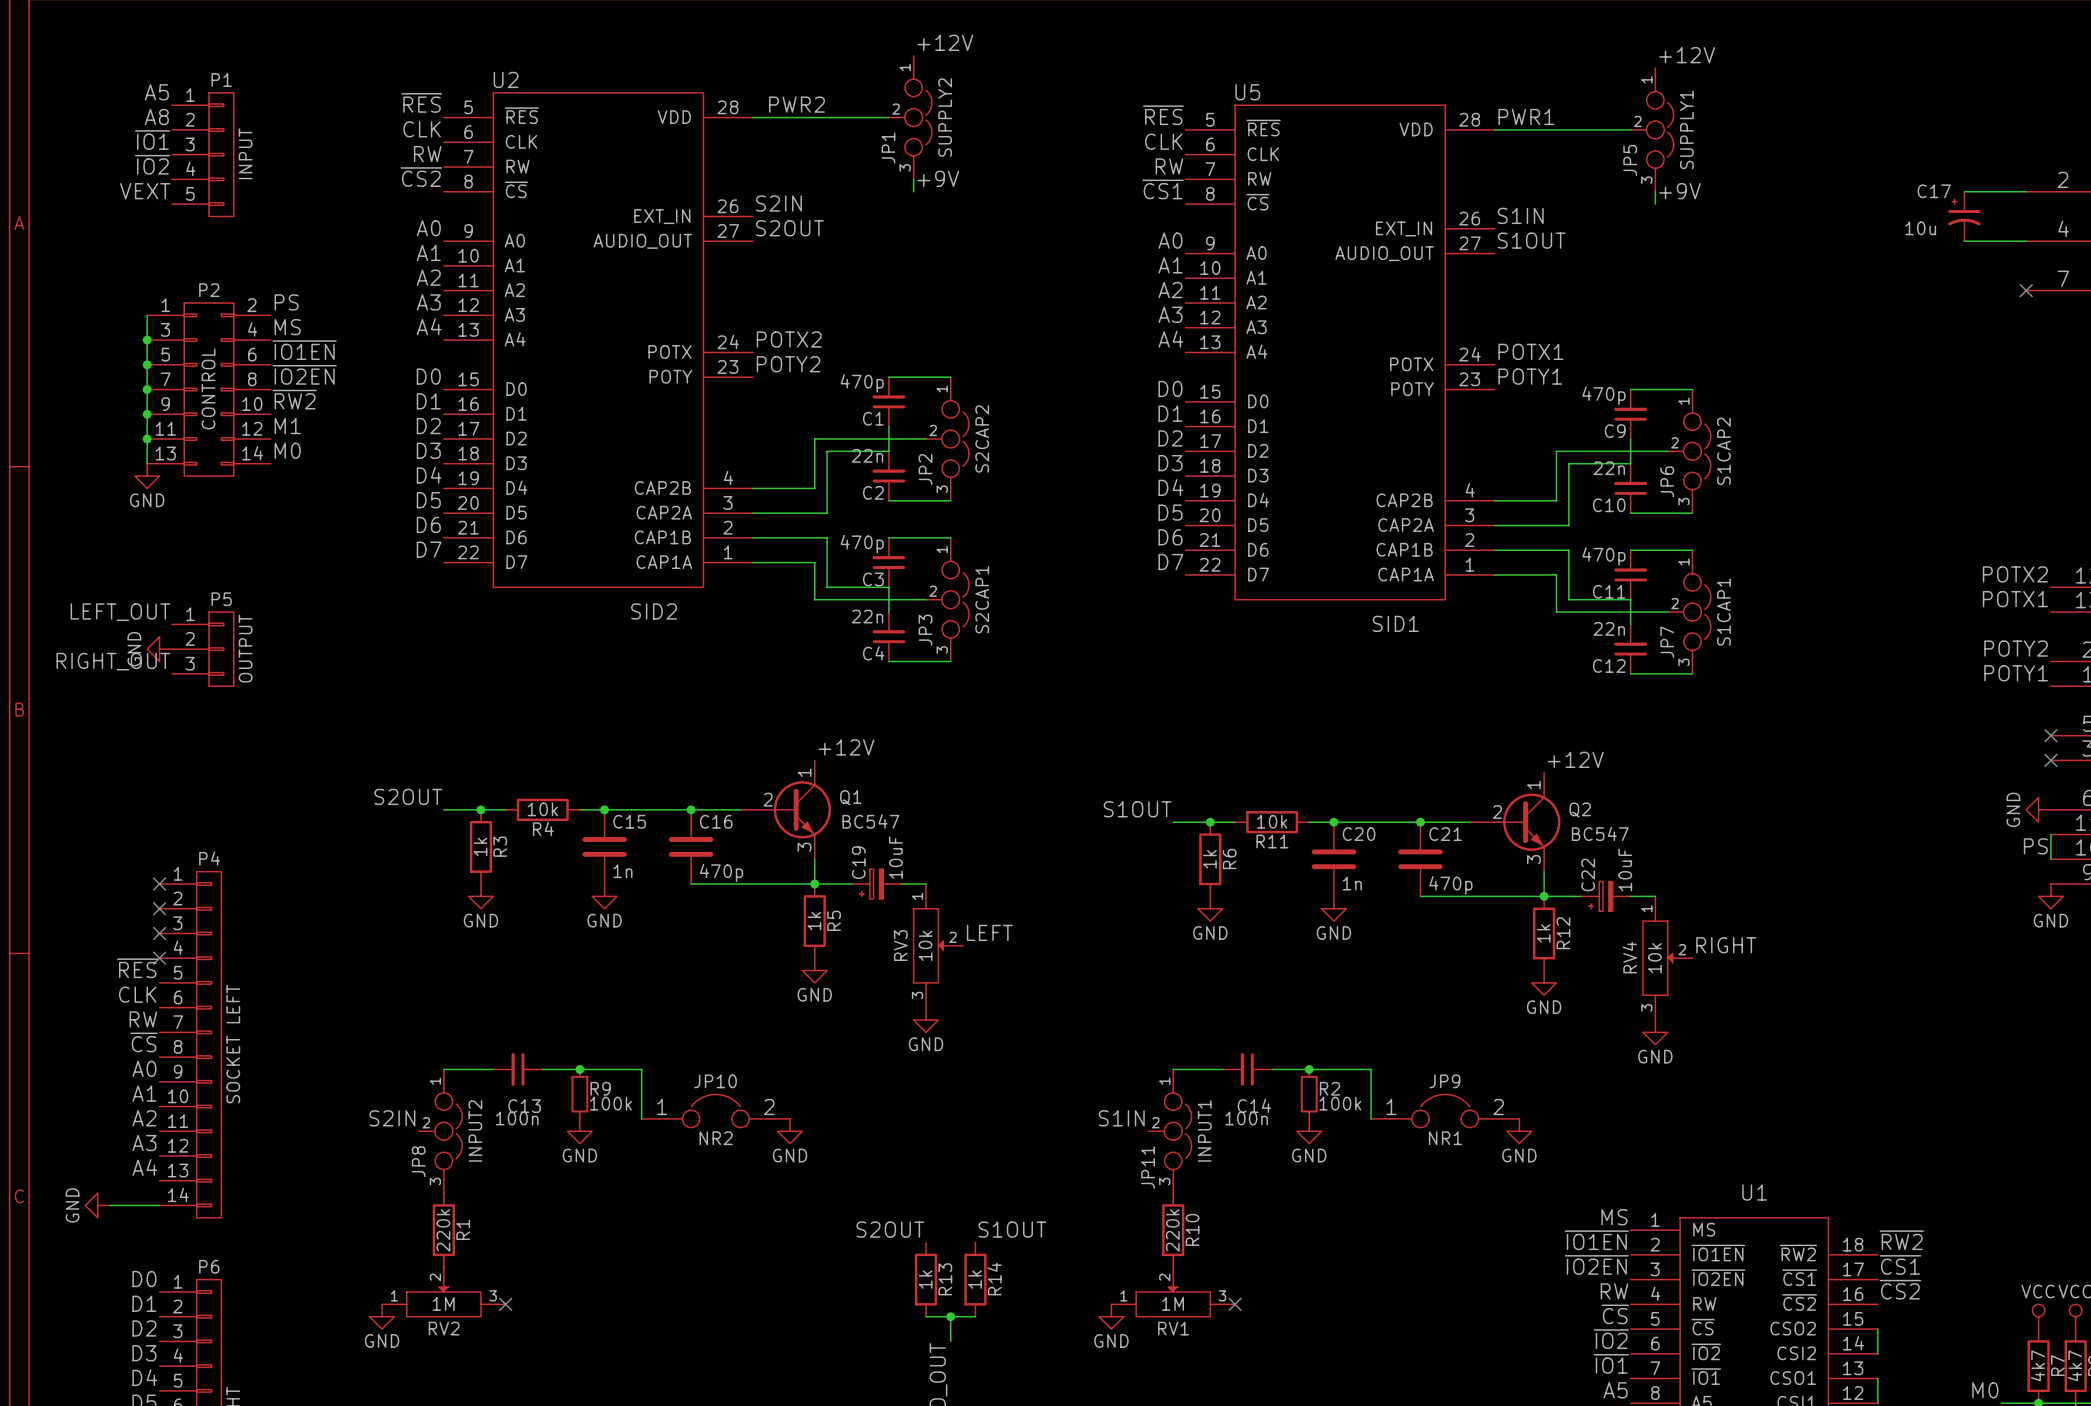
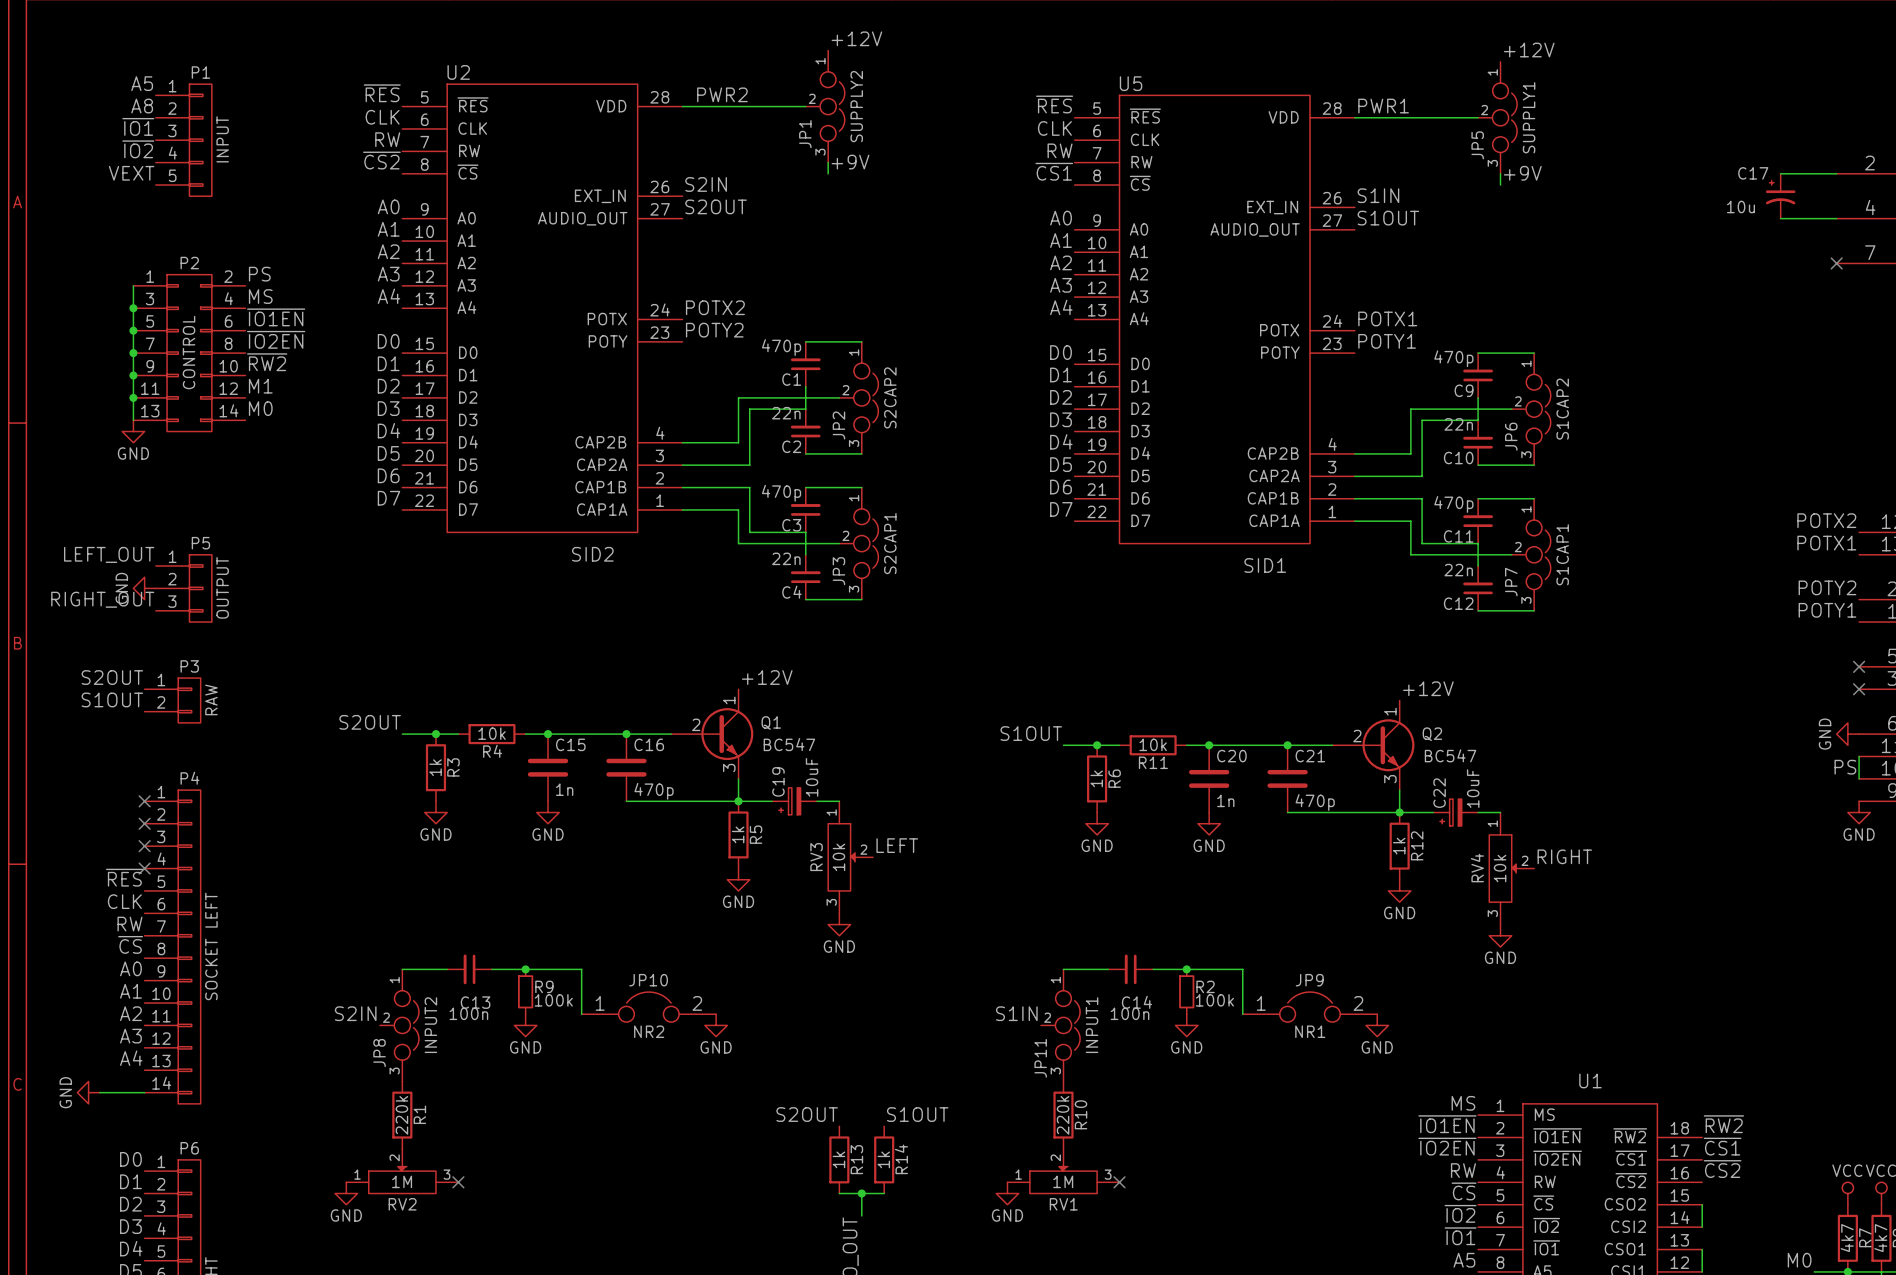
label: none -> S2OUT (112, 677)
label: none -> S1OUT (112, 699)
P3: none -> RAW (172, 700)

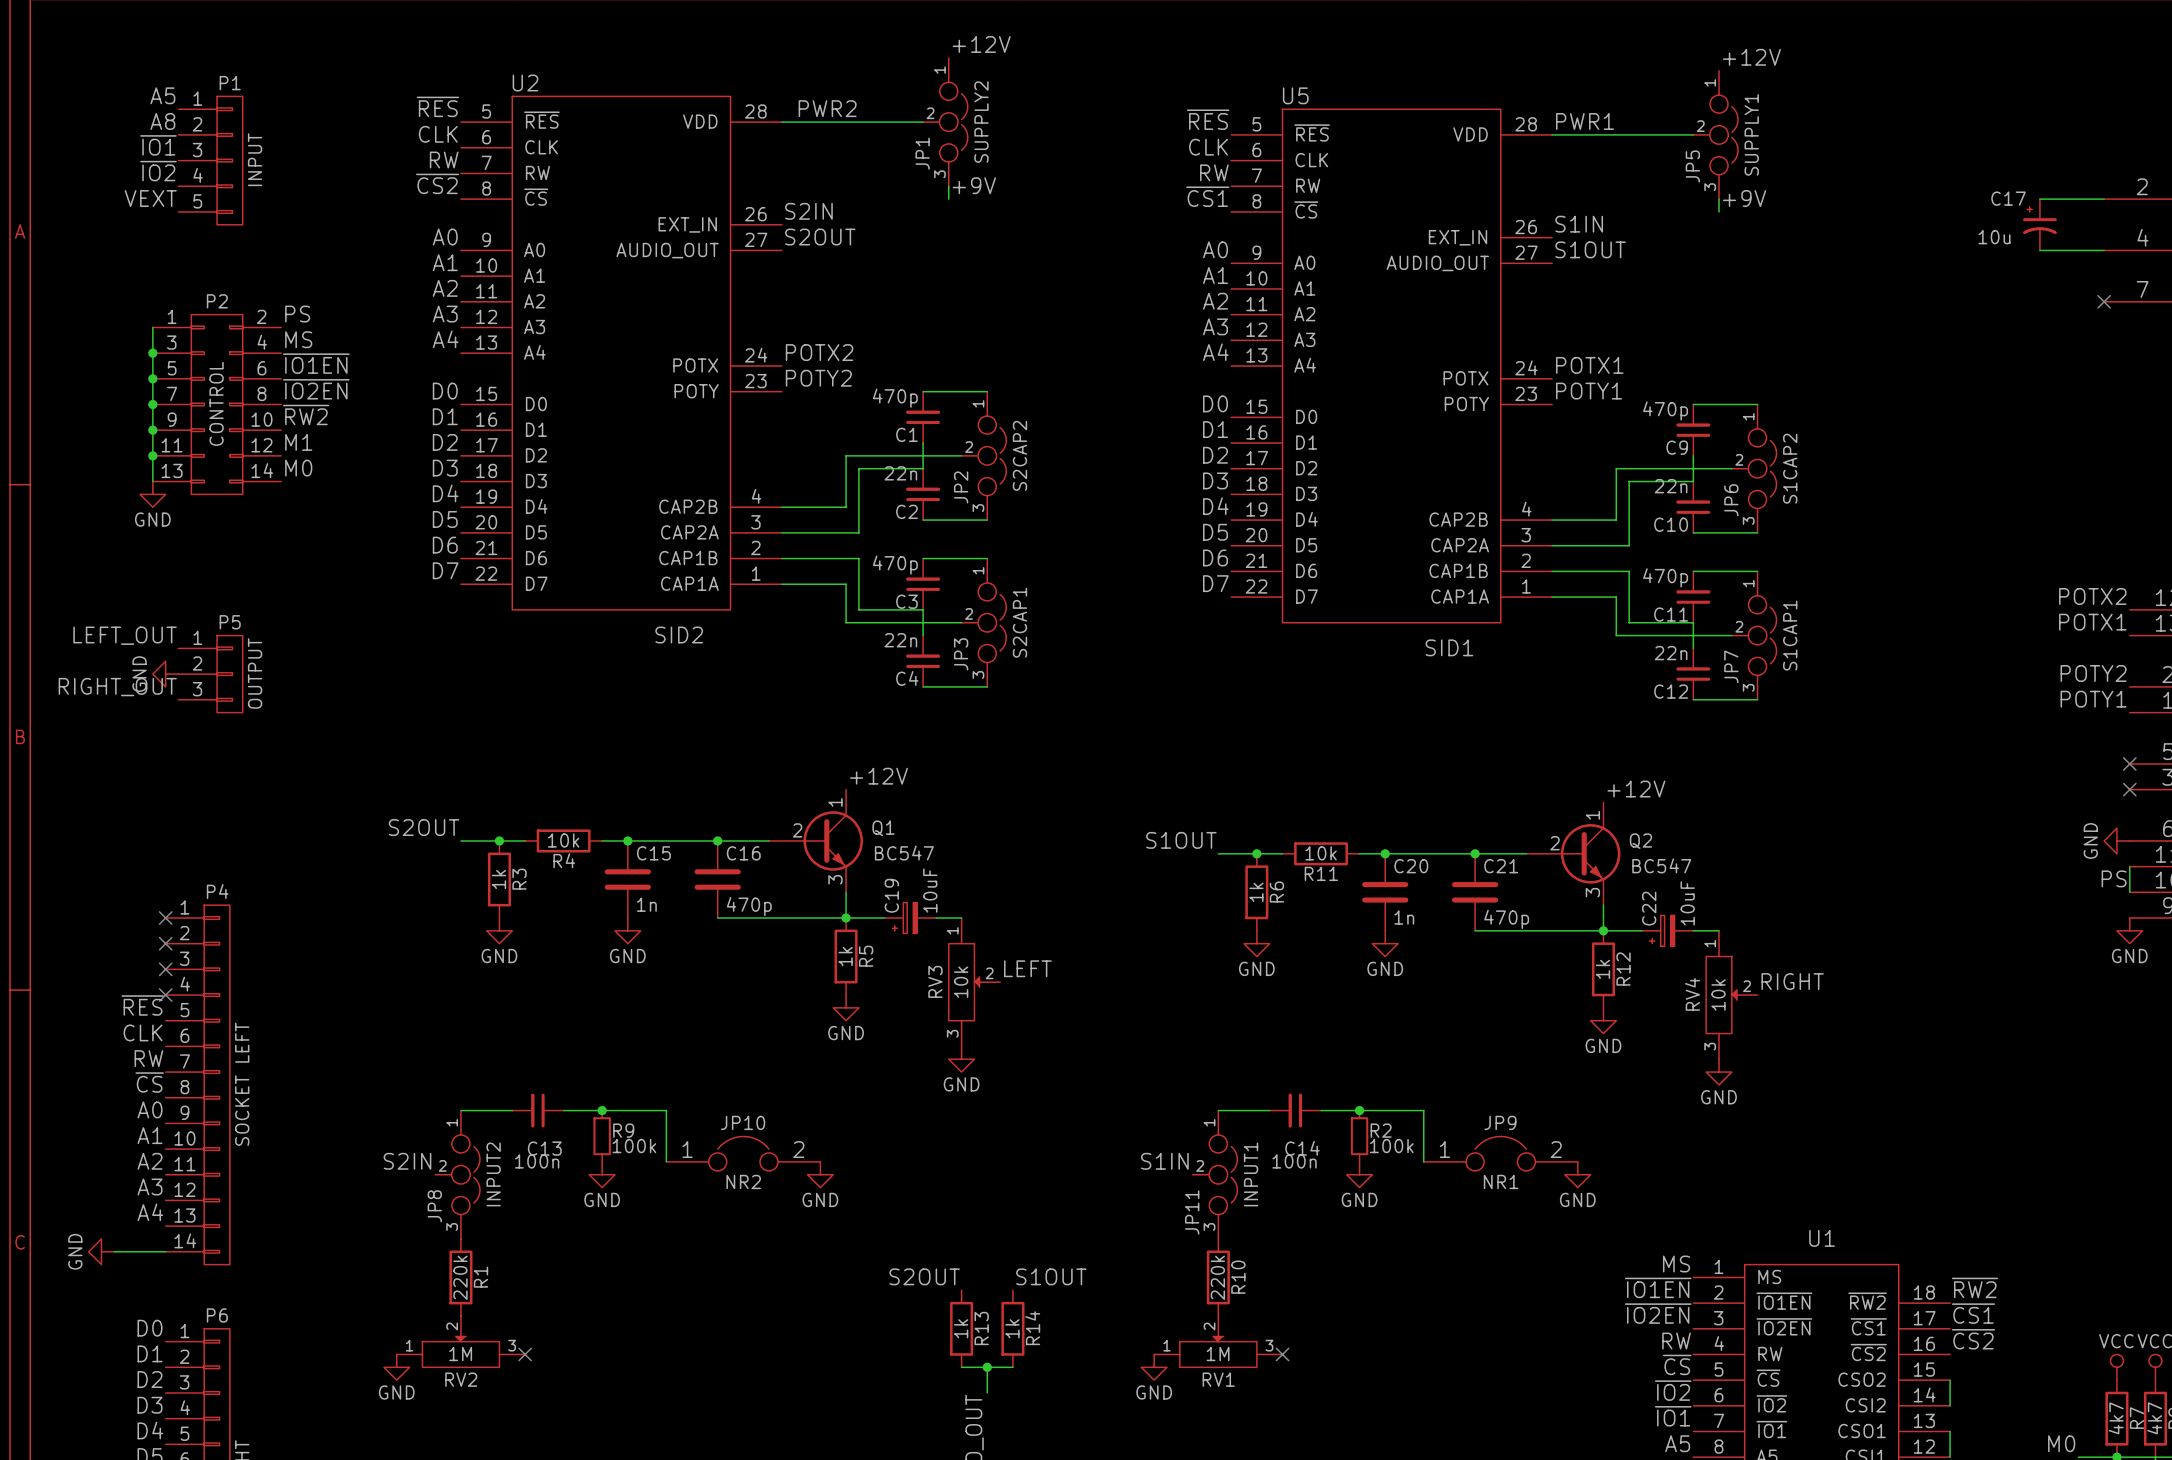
label: S2OUT (112, 677) -> none
label: S1OUT (112, 699) -> none
P3: RAW (172, 700) -> none

